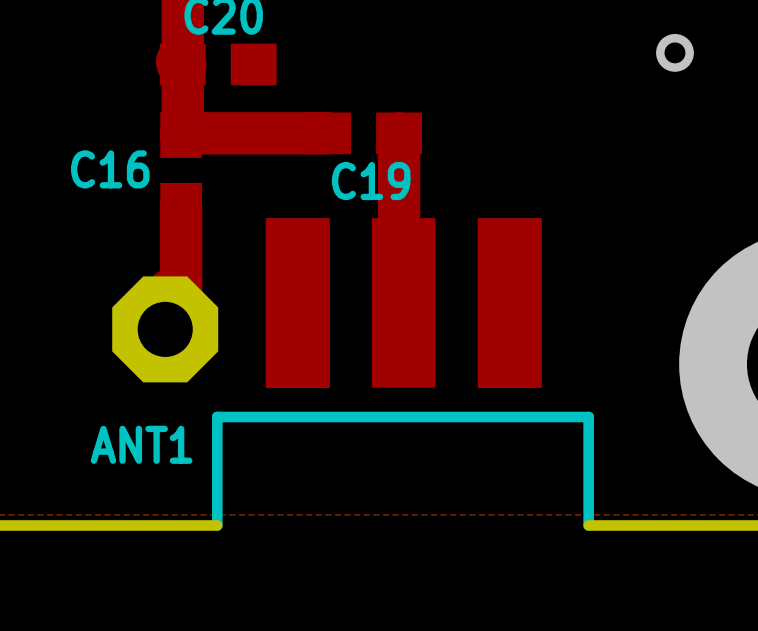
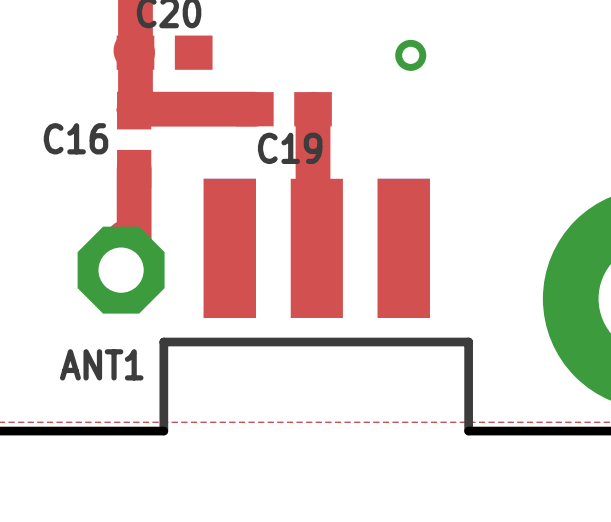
via position: (674, 52) -> (410, 55)

